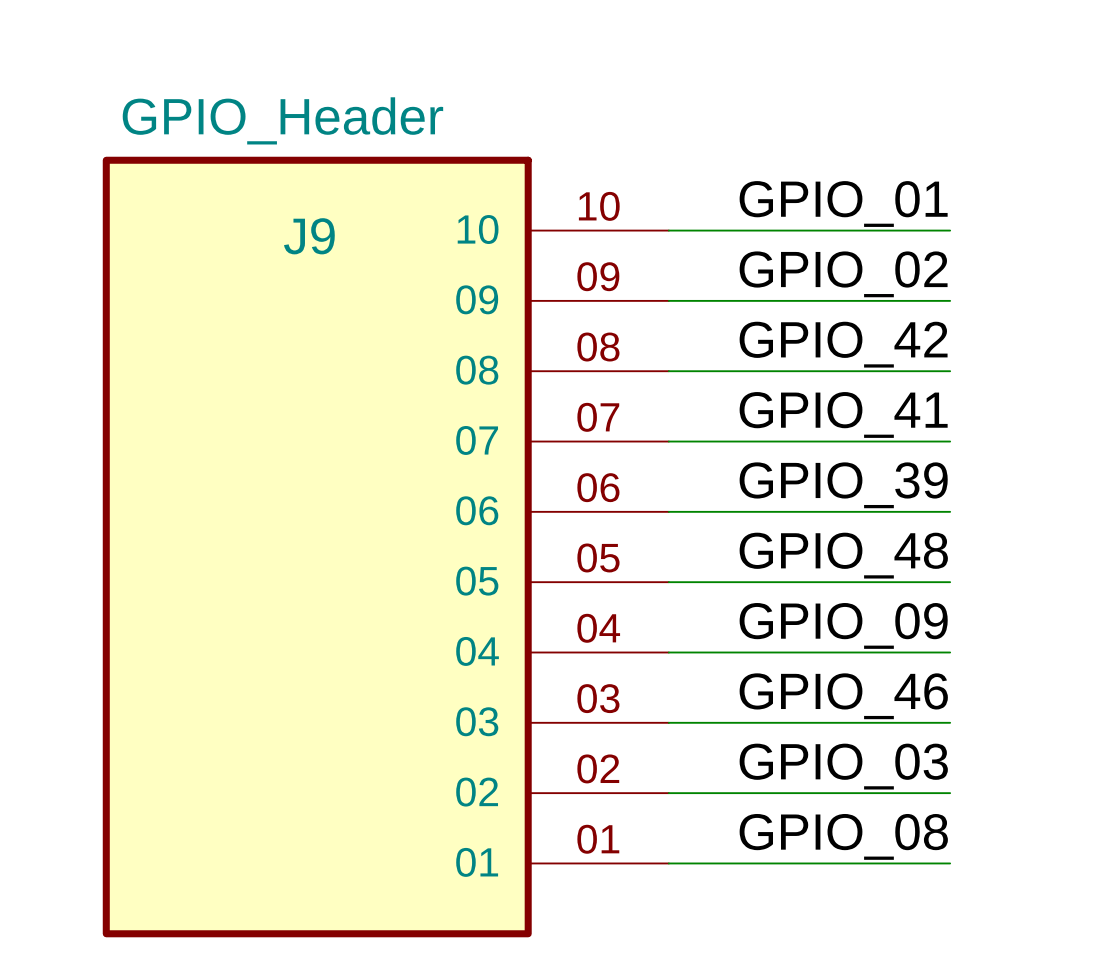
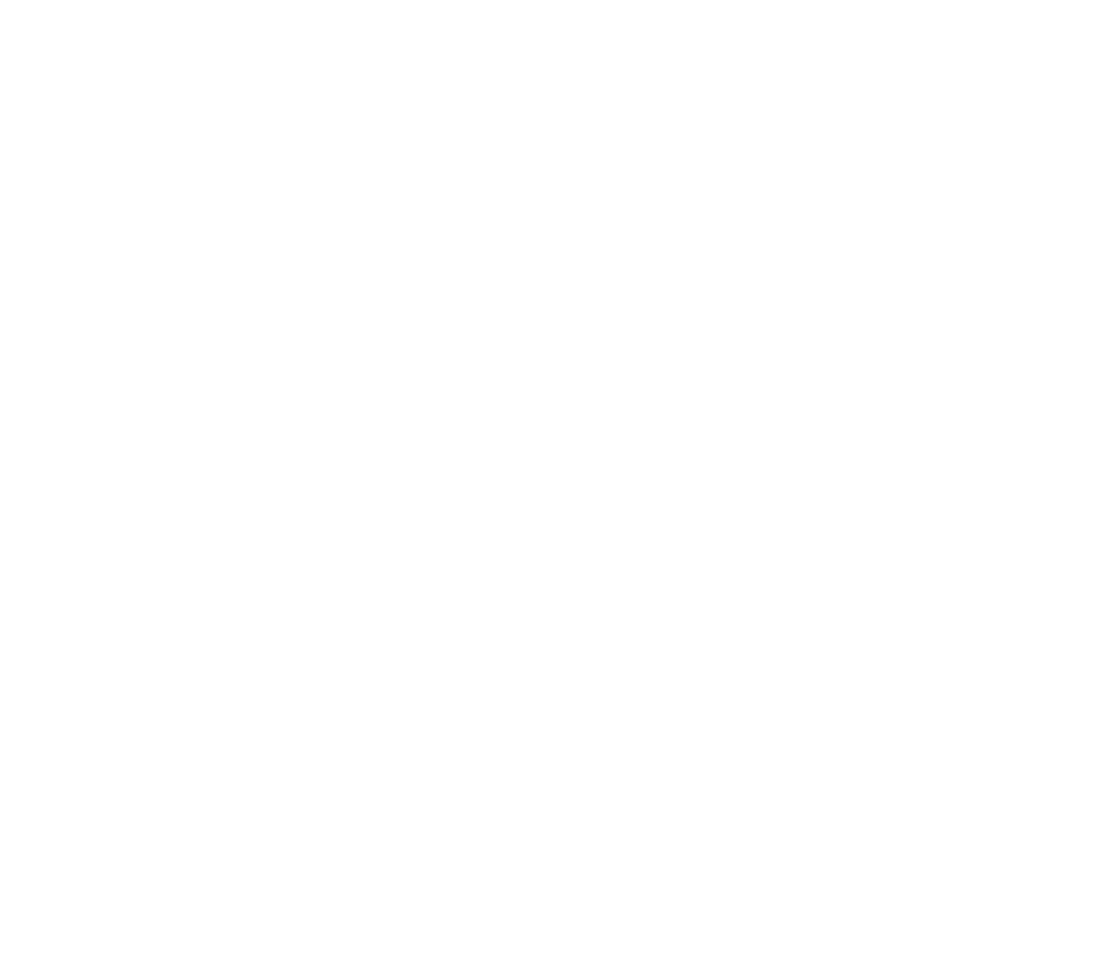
label: GPIO_01 (843, 204) -> none
wire: (668, 230) (950, 230) -> none
label: GPIO_02 (843, 274) -> none
wire: (668, 300) (950, 300) -> none
label: GPIO_42 (843, 344) -> none
wire: (668, 371) (950, 371) -> none
label: GPIO_41 (843, 414) -> none
wire: (668, 441) (950, 441) -> none
label: GPIO_39 (843, 485) -> none
wire: (668, 511) (950, 511) -> none
J9: GPIO_Header (385, 547) -> none
label: GPIO_48 (843, 555) -> none
wire: (668, 582) (950, 582) -> none
label: GPIO_09 (843, 625) -> none
wire: (668, 652) (950, 652) -> none
label: GPIO_46 (843, 696) -> none
wire: (668, 722) (950, 722) -> none
label: GPIO_03 (843, 766) -> none
wire: (668, 793) (950, 793) -> none
label: GPIO_08 (843, 836) -> none
wire: (668, 863) (950, 863) -> none

